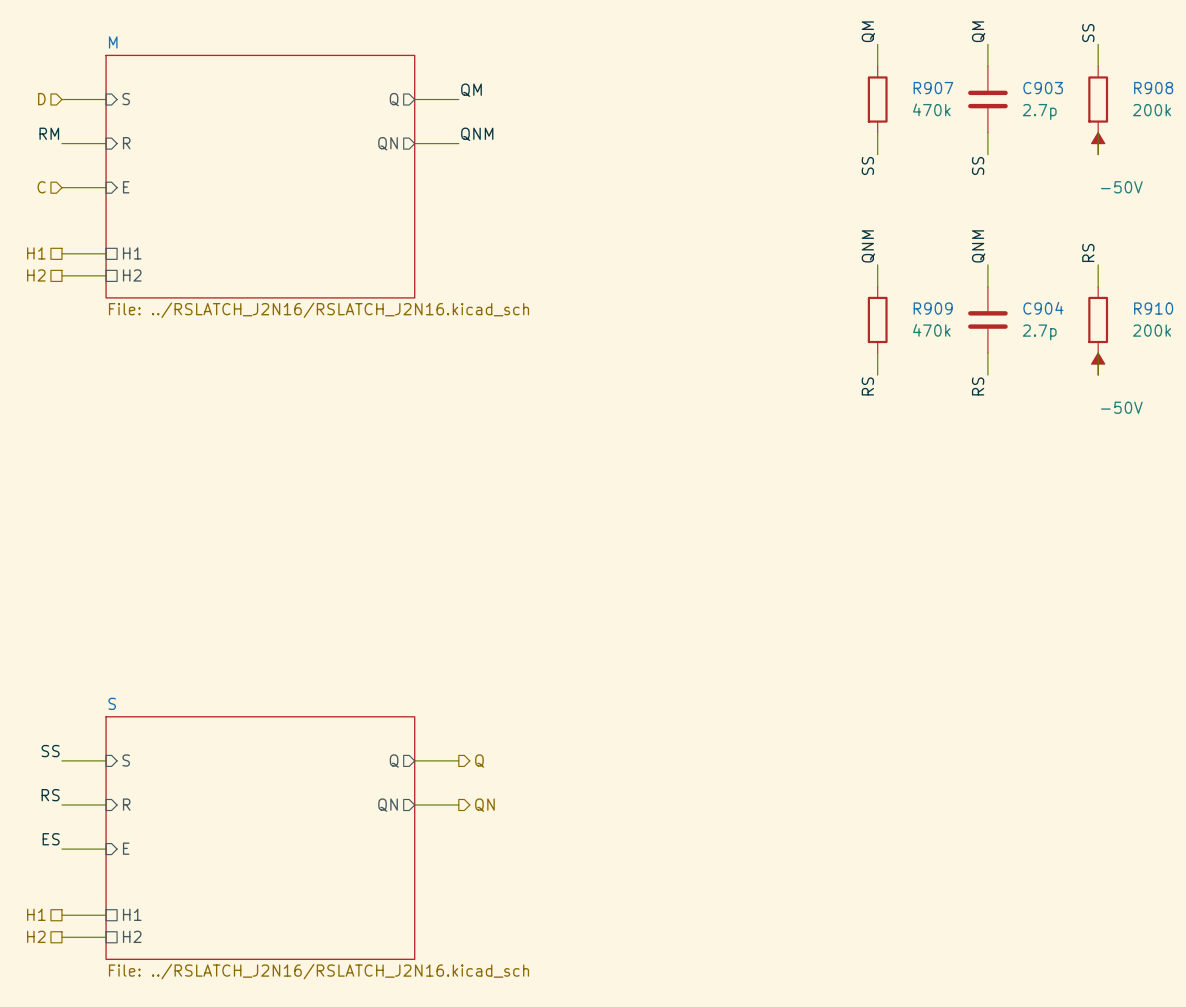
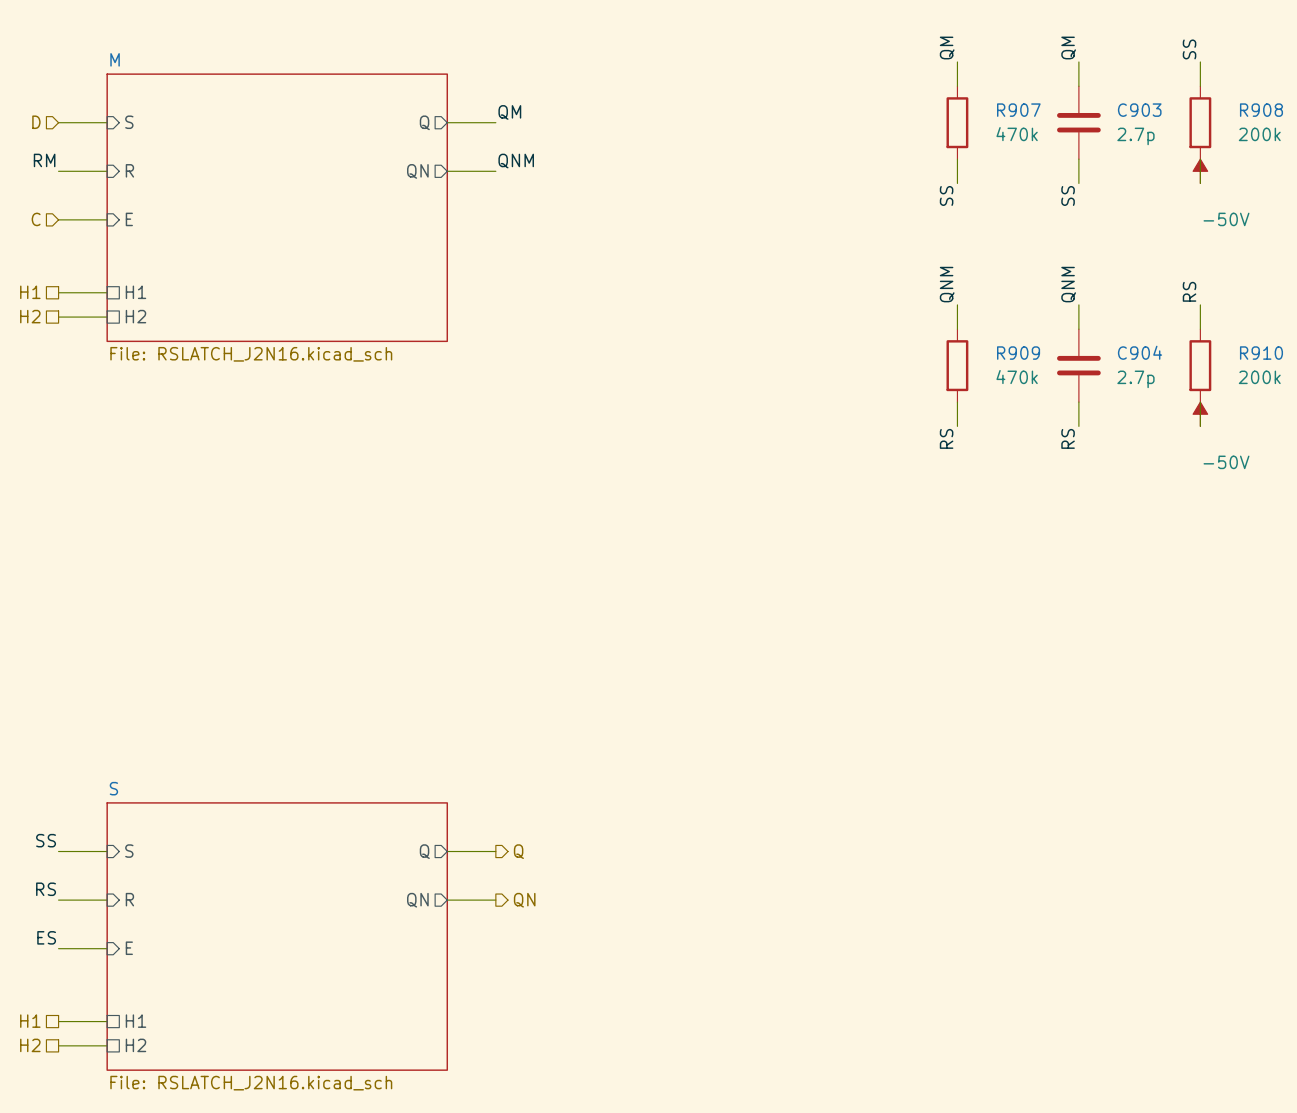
sheet M value: File: ../RSLATCH_J2N16/RSLATCH_J2N16.kicad_sch (319, 310) -> File: RSLATCH_J2N16.kicad_sch (251, 354)
sheet S value: File: ../RSLATCH_J2N16/RSLATCH_J2N16.kicad_sch (319, 971) -> File: RSLATCH_J2N16.kicad_sch (251, 1083)

